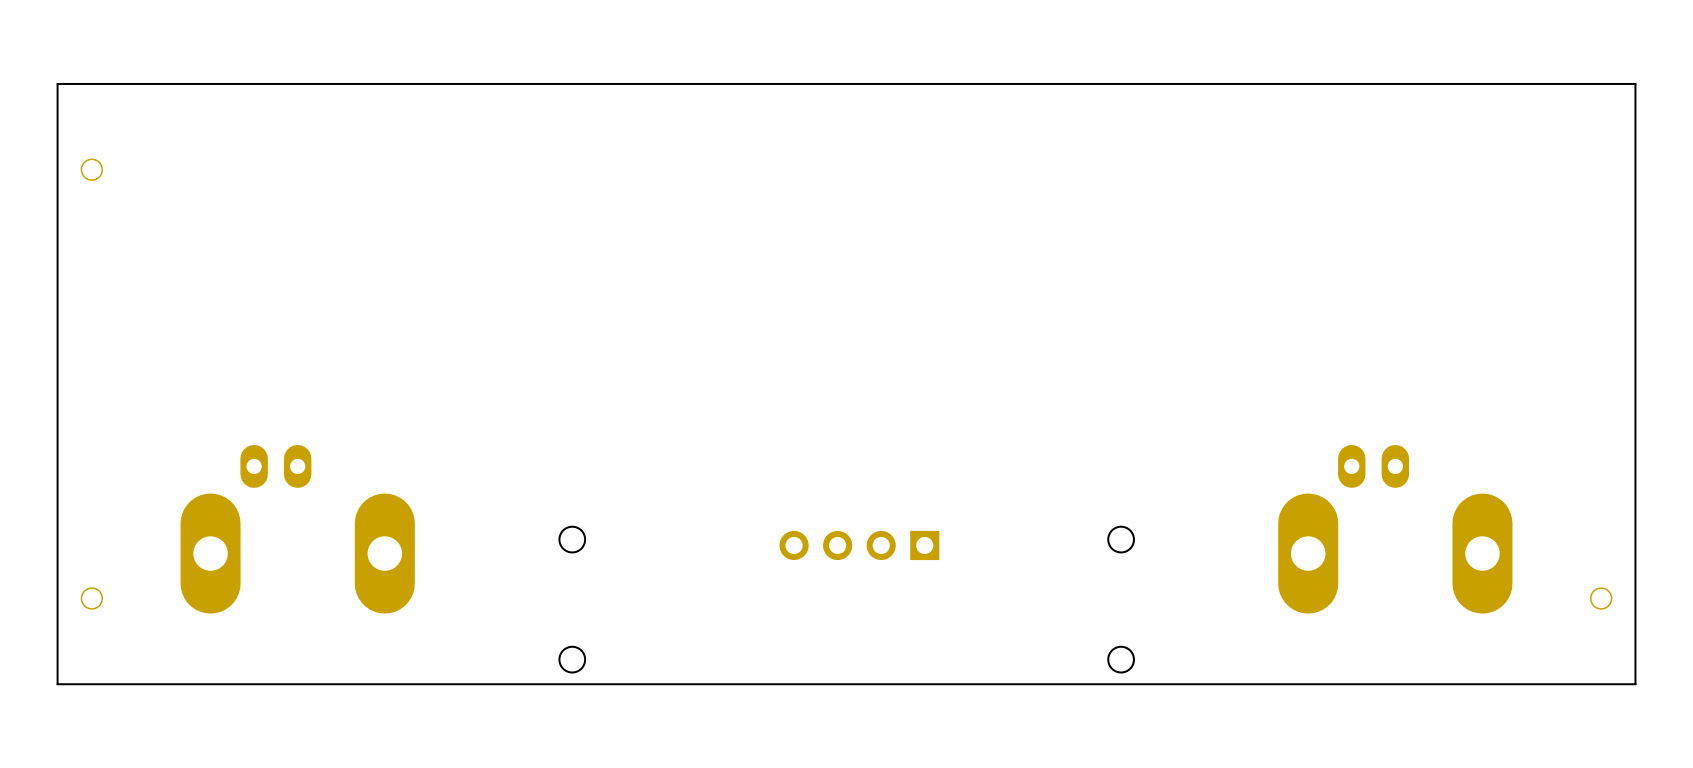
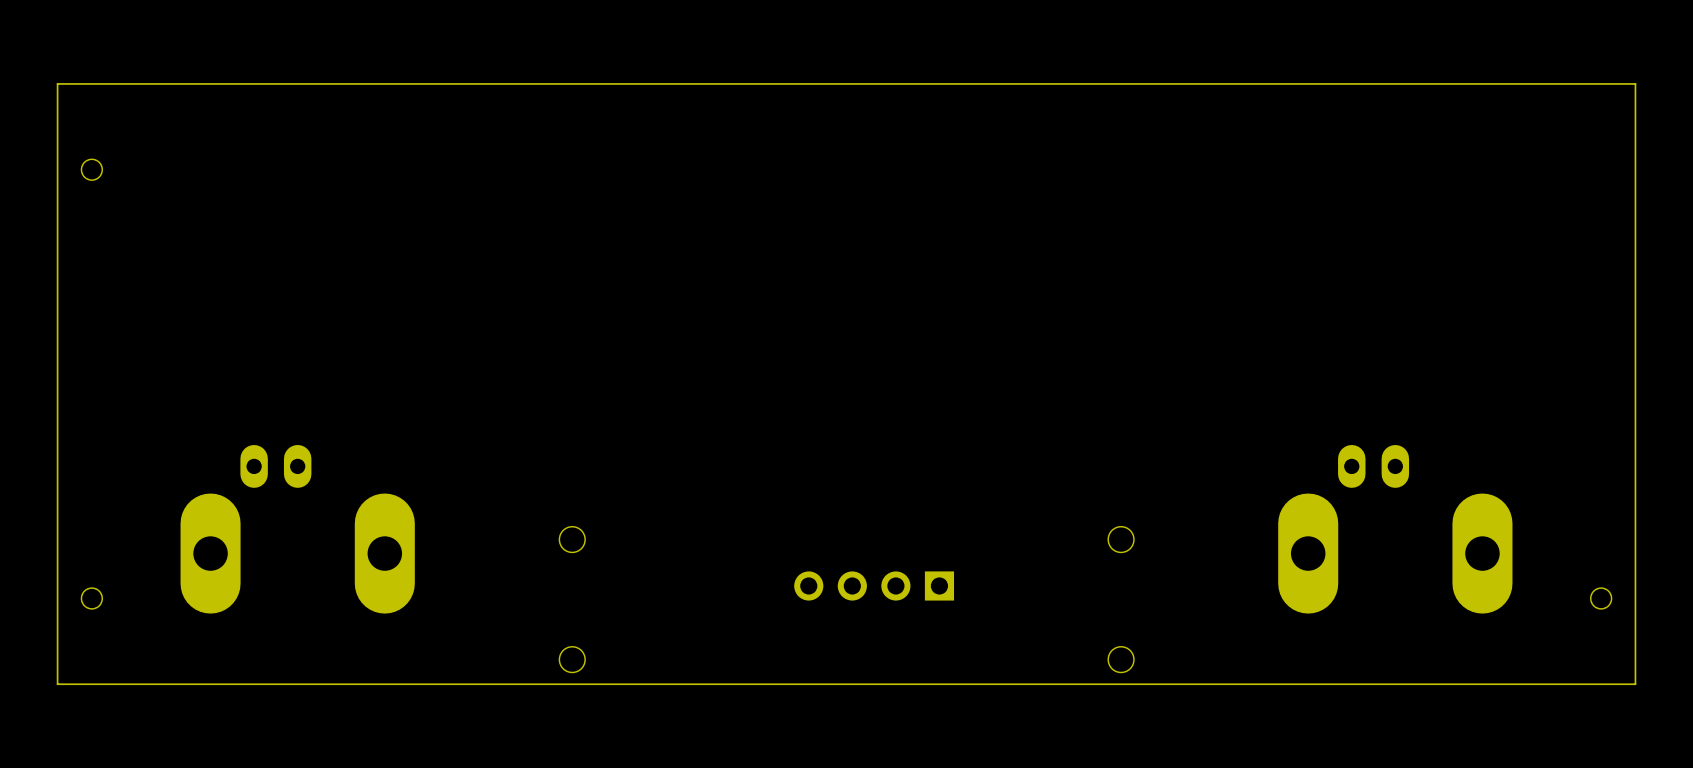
part position: (859, 545) -> (874, 585)

